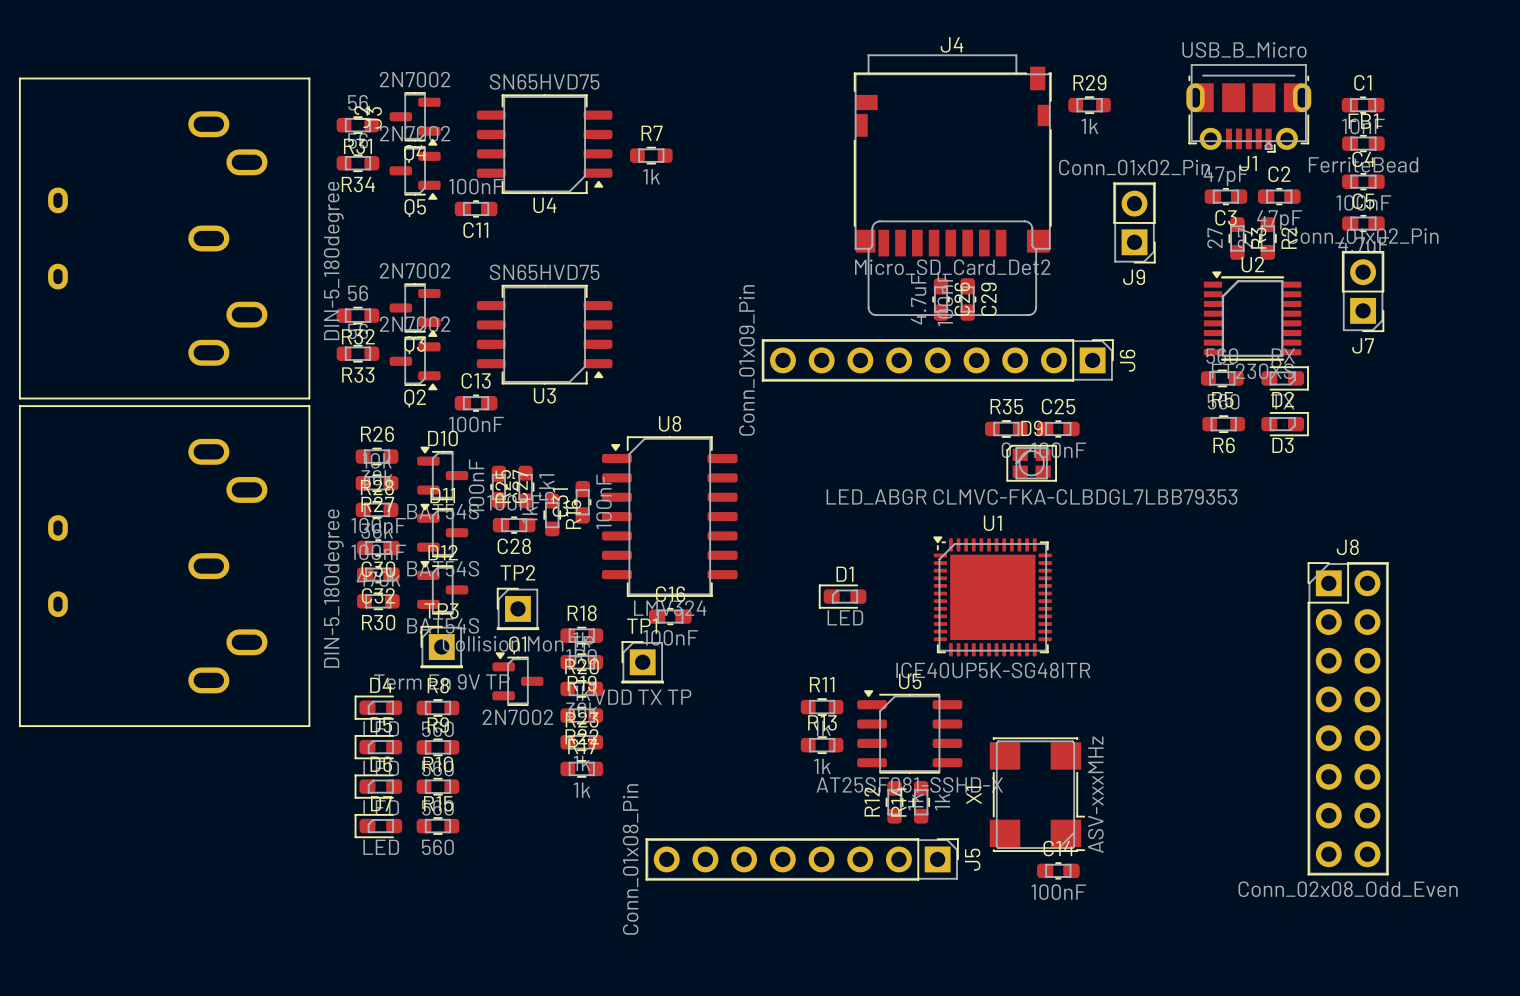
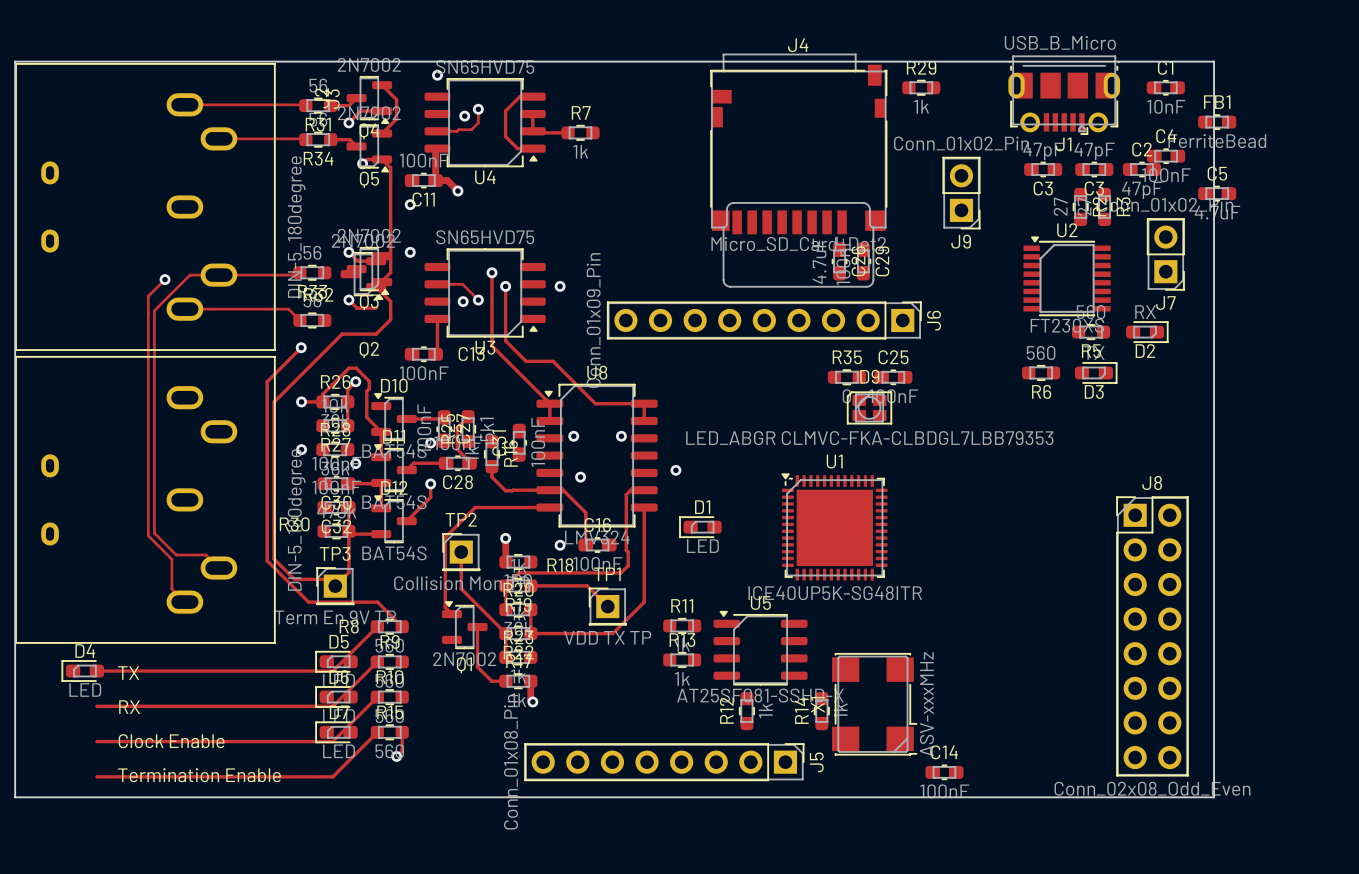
board edge: none -> (15, 61) (1214, 61) (1214, 797) (15, 797) (15, 61)
via: none -> (437, 75)
track: none -> (382, 85) (396, 99) (396, 119) (382, 133)
R29 position: (1089, 105) -> (921, 87)
C1 position: (1363, 105) -> (1165, 87)
J1 position: (1248, 108) -> (1064, 95)
track: none -> (532, 96) (519, 96) (505, 110) (505, 136) (517, 148) (532, 148)
track: none -> (356, 98) (349, 105) (330, 105)
track: none -> (184, 104) (305, 105)
track: none -> (478, 109) (478, 122) (471, 129) (437, 131)
via: none -> (478, 109)
track: none -> (382, 111) (360, 111) (348, 122)
track: none -> (532, 114) (534, 132) (568, 132)
via: none -> (464, 116)
via: none -> (348, 122)
track: none -> (218, 138) (305, 139)
track: none -> (330, 139) (349, 139) (356, 146)
track: none -> (437, 148) (435, 150) (435, 180) (447, 180) (457, 191)
C4 position: (1363, 181) -> (1166, 156)
J4 position: (952, 185) -> (798, 170)
track: none -> (362, 163) (366, 159) (382, 159) (390, 167) (390, 272) (376, 287) (390, 301) (390, 319) (376, 334) (342, 334) (274, 402) (274, 558) (294, 579) (328, 579) (335, 586) (348, 572) (348, 507)
via: none -> (362, 163)
C3: none -> 47pF (1043, 169)
via: none -> (457, 191)
J9 position: (1134, 222) -> (961, 193)
via: none -> (410, 204)
R2 position: (1267, 238) -> (1080, 206)
track: none -> (348, 252) (357, 261) (376, 261)
via: none -> (348, 252)
via: none -> (410, 252)
J7 position: (1363, 291) -> (1165, 254)
track: none -> (299, 267) (292, 275) (190, 275) (154, 310) (154, 533) (176, 555) (205, 555) (218, 568)
track: none -> (491, 272) (491, 345) (549, 403) (549, 421)
via: none -> (491, 272)
R32 position: (357, 315) -> (312, 320)
U2 position: (1252, 316) -> (1067, 276)
track: none -> (165, 279) (148, 296) (148, 535) (171, 559) (171, 589) (184, 602)
via: none -> (165, 279)
track: none -> (437, 284) (462, 284) (478, 300)
track: none -> (505, 286) (505, 340) (526, 361) (553, 361) (595, 403) (644, 403) (644, 421)
via: none -> (505, 286)
via: none -> (560, 286)
track: none -> (348, 300) (357, 308) (376, 308)
via: none -> (348, 300)
via: none -> (478, 300)
via: none -> (463, 301)
track: none -> (184, 309) (288, 309) (299, 320)
R33 position: (357, 353) -> (312, 272)
J6 position: (937, 360) -> (764, 320)
Q2 position: (415, 363) -> (363, 276)
track: none -> (437, 318) (437, 352) (435, 354)
C13 name position: C13 (476, 380) -> C13 (471, 354)
track: none -> (301, 347) (267, 381) (267, 560) (308, 602) (377, 602) (402, 626)
via: none -> (301, 347)
R6 position: (1223, 424) -> (1041, 372)
D3 position: (1285, 424) -> (1096, 372)
R35 position: (1006, 428) -> (846, 377)
C25 position: (1058, 428) -> (893, 377)
track: none -> (355, 381) (347, 389) (347, 425)
via: none -> (355, 381)
track: none -> (301, 401) (322, 401) (322, 394) (348, 368) (356, 368) (369, 381) (369, 388) (366, 391) (366, 417) (381, 431) (381, 457)
via: none -> (301, 401)
D9 position: (1031, 463) -> (869, 407)
track: none -> (444, 417) (406, 418)
track: none -> (468, 416) (457, 427) (457, 449) (469, 463)
via: none -> (573, 436)
via: none -> (621, 436)
via: none -> (430, 443)
via: none -> (301, 449)
via: none -> (355, 463)
track: none -> (446, 463) (413, 463) (406, 470)
track: none -> (491, 466) (491, 477) (505, 490) (563, 490) (585, 512) (585, 544)
via: none -> (675, 470)
via: none -> (580, 477)
track: none -> (348, 483) (381, 483) (381, 508)
track: none -> (430, 483) (430, 497) (406, 521)
via: none -> (430, 483)
track: none -> (644, 490) (630, 490) (626, 494) (628, 565) (621, 572) (518, 572) (505, 585) (505, 609)
track: none -> (549, 507) (475, 507) (445, 537) (445, 607) (451, 614)
track: none -> (644, 507) (644, 602) (612, 633) (530, 633) (530, 609)
D1 position: (842, 596) -> (700, 527)
U1 position: (992, 596) -> (834, 526)
track: none -> (348, 531) (351, 534) (381, 534)
TP2 position: (517, 608) -> (461, 552)
track: none -> (505, 538) (505, 562)
via: none -> (505, 538)
R18 name position: R18 (582, 613) -> R18 (560, 565)
via: none -> (560, 545)
R30 name position: R30 (378, 622) -> R30 (294, 524)
track: none -> (461, 552) (461, 588) (505, 633) (505, 657)
Q1 name position: Q1 (517, 645) -> Q1 (464, 665)
TP3 position: (441, 647) -> (335, 586)
track: none -> (530, 585) (587, 585) (607, 606)
TP1 position: (642, 662) -> (607, 606)
Q1 position: (517, 679) -> (464, 625)
R8 name position: R8 (438, 685) -> R8 (349, 626)
D4 position: (378, 707) -> (82, 671)
track: none -> (377, 626) (333, 671) (96, 671)
R11 position: (822, 707) -> (682, 625)
track: none -> (477, 627) (477, 667) (491, 681) (505, 681)
J8 position: (1348, 718) -> (1152, 636)
U5 position: (909, 731) -> (760, 648)
R13 position: (822, 745) -> (682, 659)
track: none -> (377, 661) (332, 706) (96, 706)
text: none -> TX (128, 673)
track: none -> (530, 681) (530, 699) (532, 701)
track: none -> (377, 697) (332, 741) (96, 741)
via: none -> (532, 701)
X1 position: (1037, 794) -> (874, 704)
text: none -> RX (129, 707)
R12 position: (894, 802) -> (746, 711)
track: none -> (377, 732) (332, 776) (96, 776)
track: none -> (402, 732) (402, 750) (396, 756)
text: none -> Clock Enable (171, 741)
via: none -> (396, 756)
J5 position: (802, 859) -> (664, 762)
text: none -> Termination Enable (199, 775)

